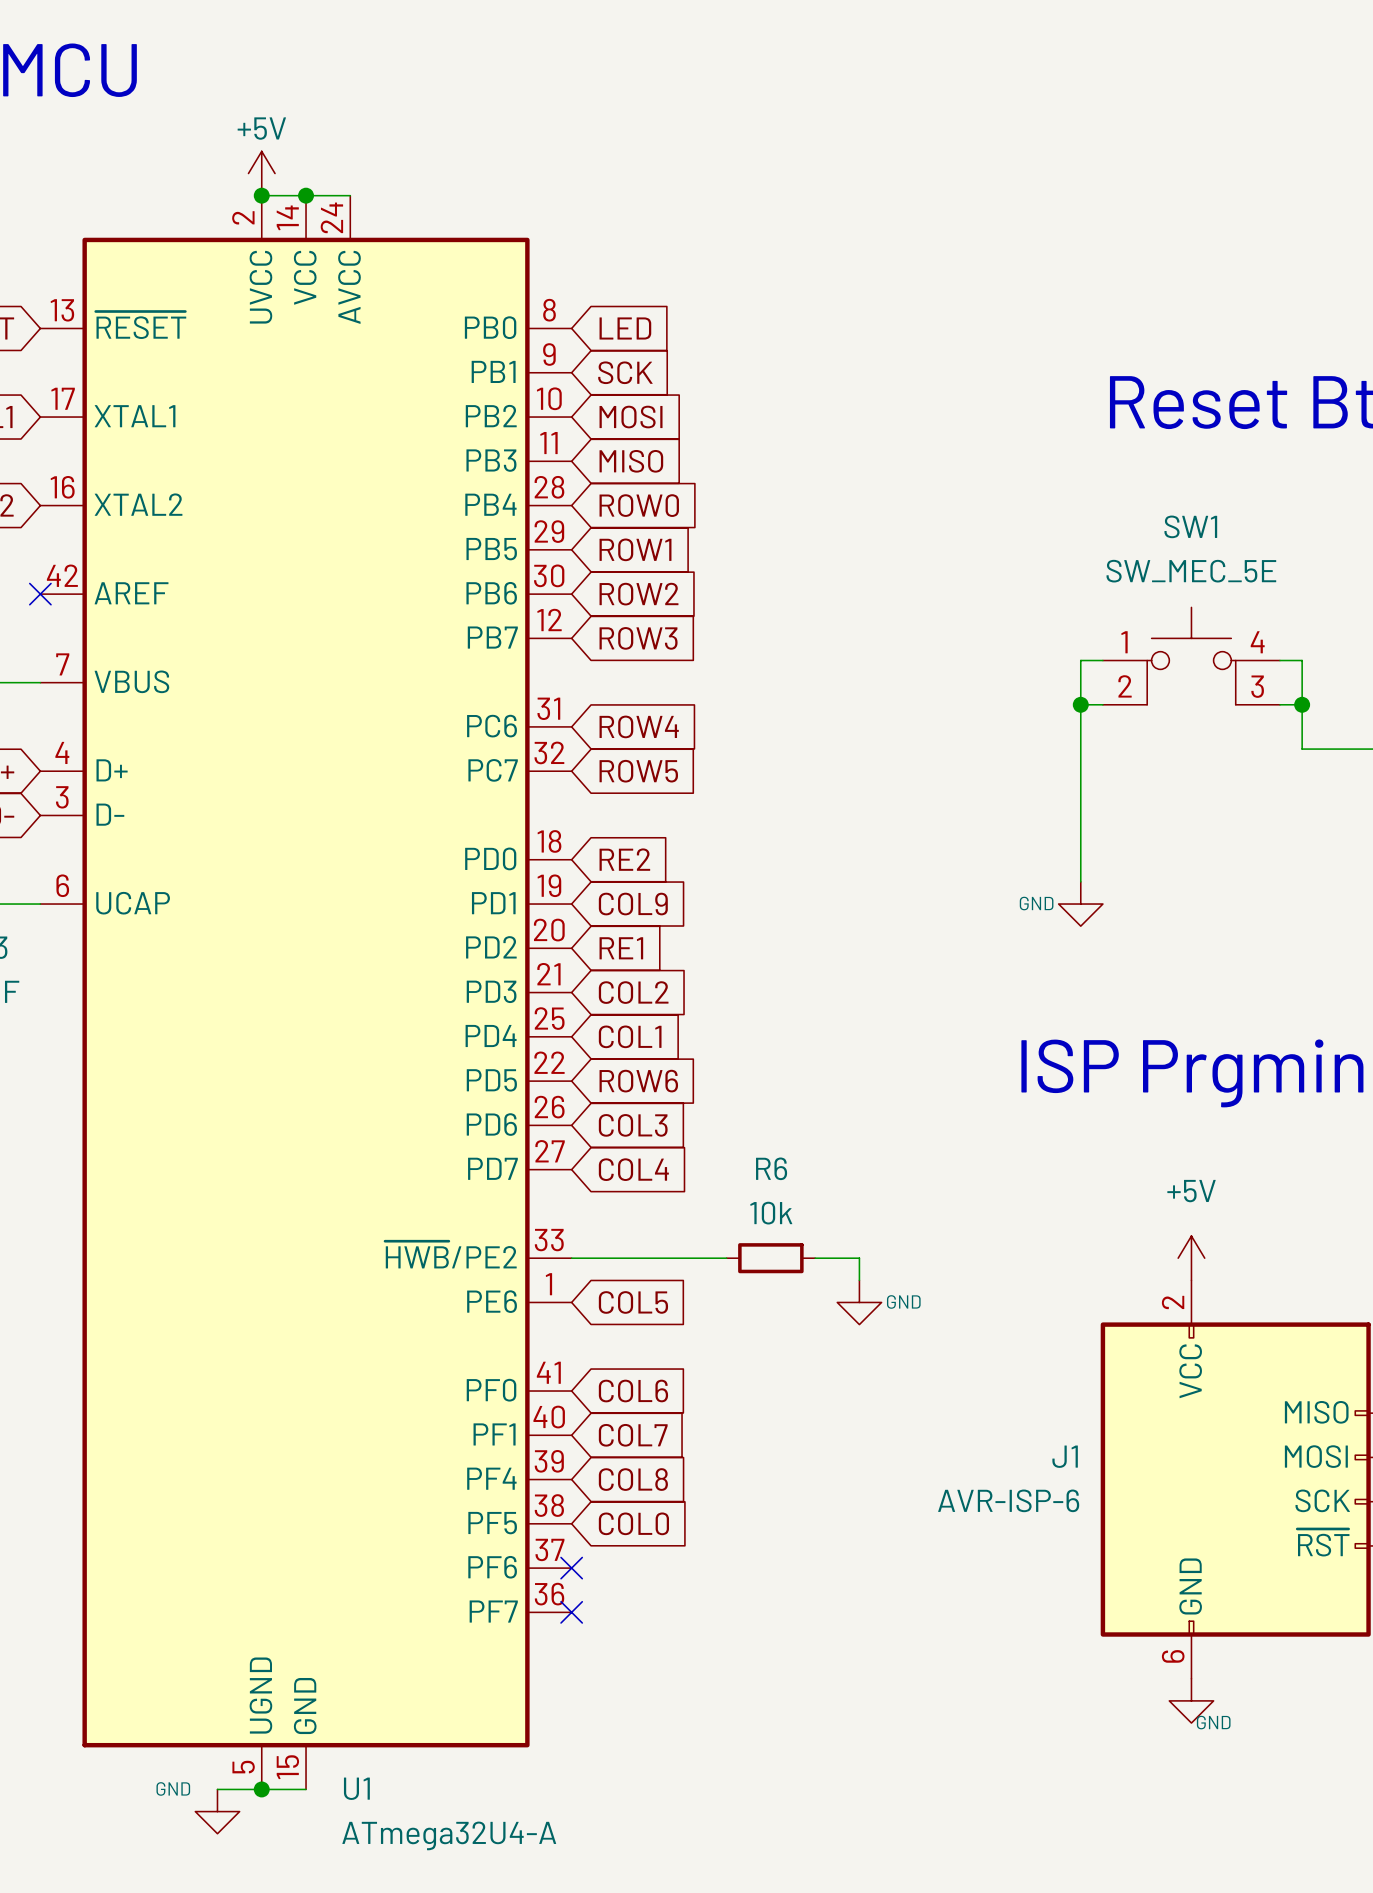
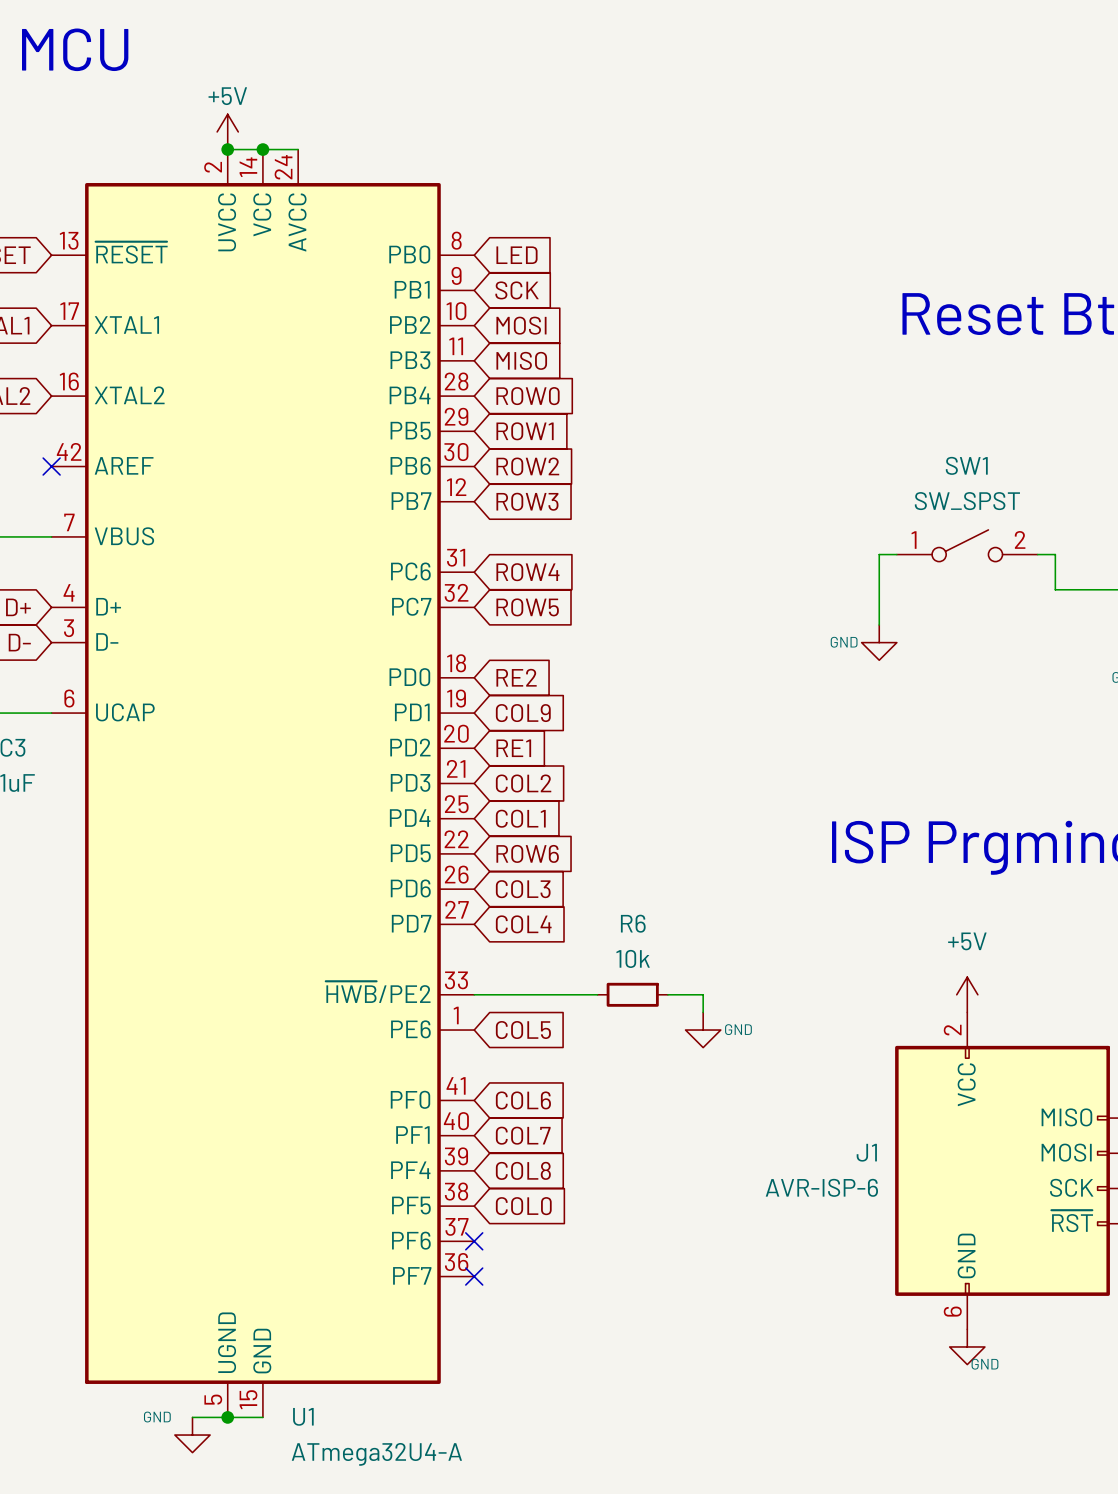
SW1 value: SW_MEC_5E (1191, 571) -> SW_SPST (967, 501)
SW1 symbol: [1102, 607, 1281, 705] -> [896, 529, 1038, 562]
wire: (1102, 660) (1080, 660) (1080, 704) -> none
wire: (1280, 660) (1302, 660) (1302, 704) -> none
junction: (1080, 704) -> none
junction: (1302, 704) -> none
wire: (1080, 793) (1080, 881) -> none
power symbol position: GND (1080, 904) -> GND (879, 642)

